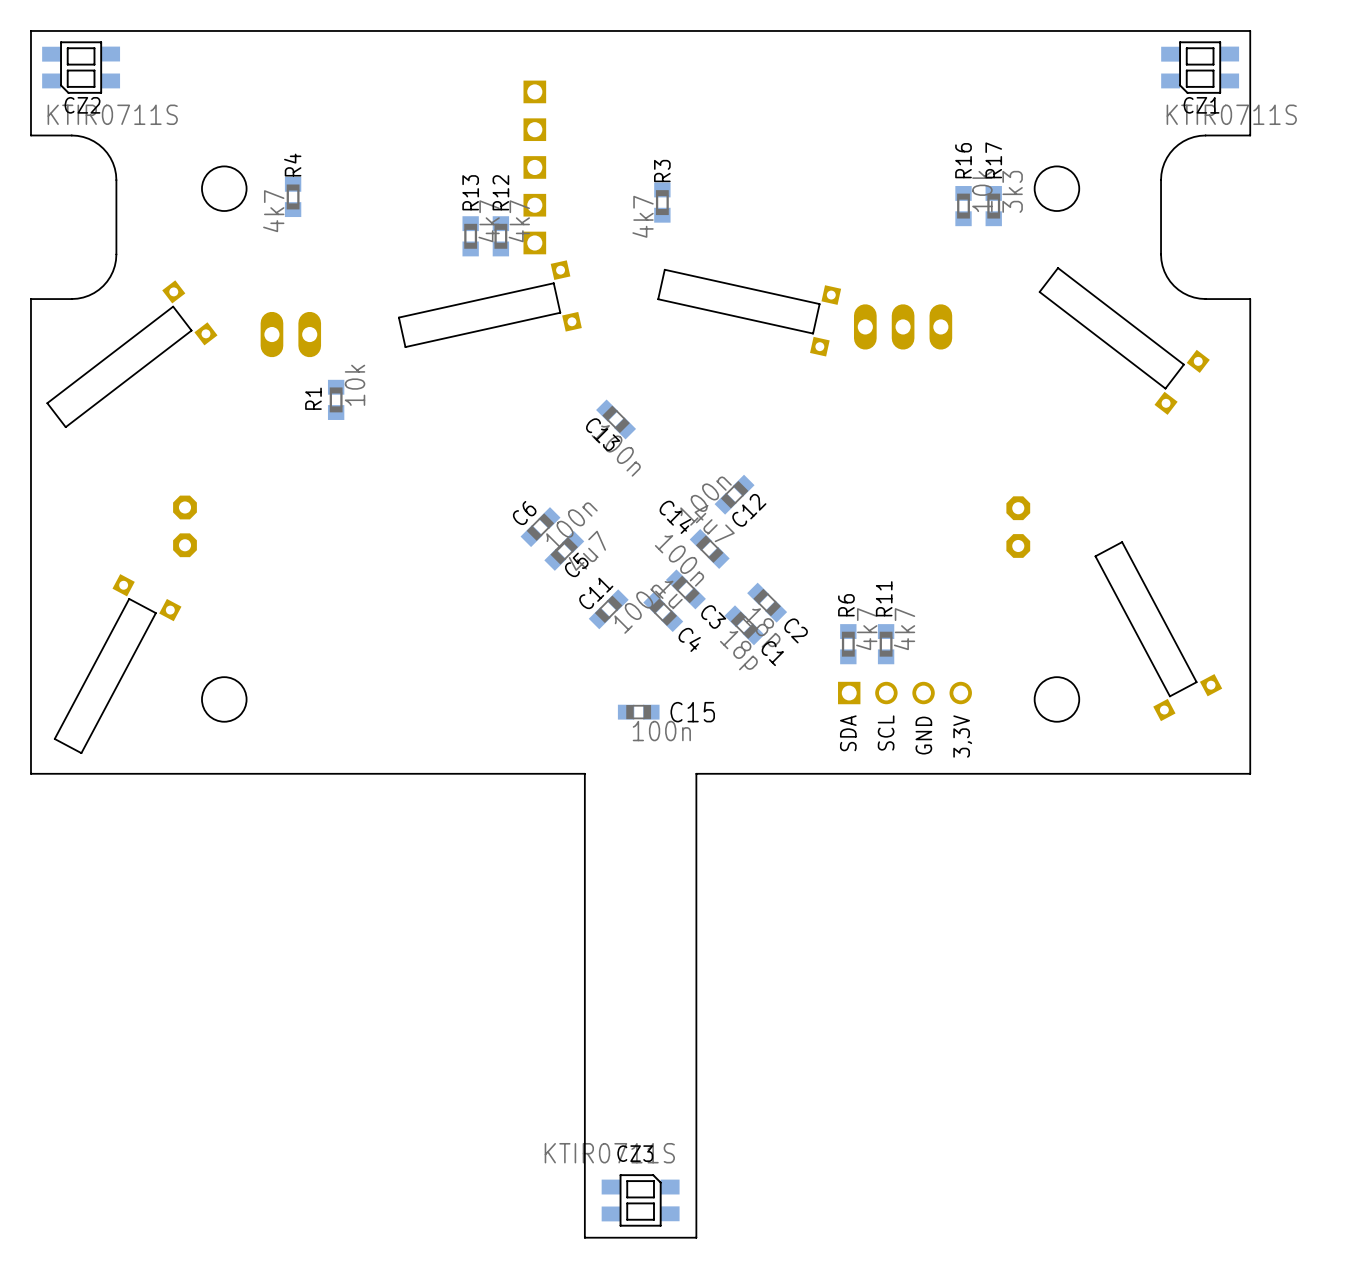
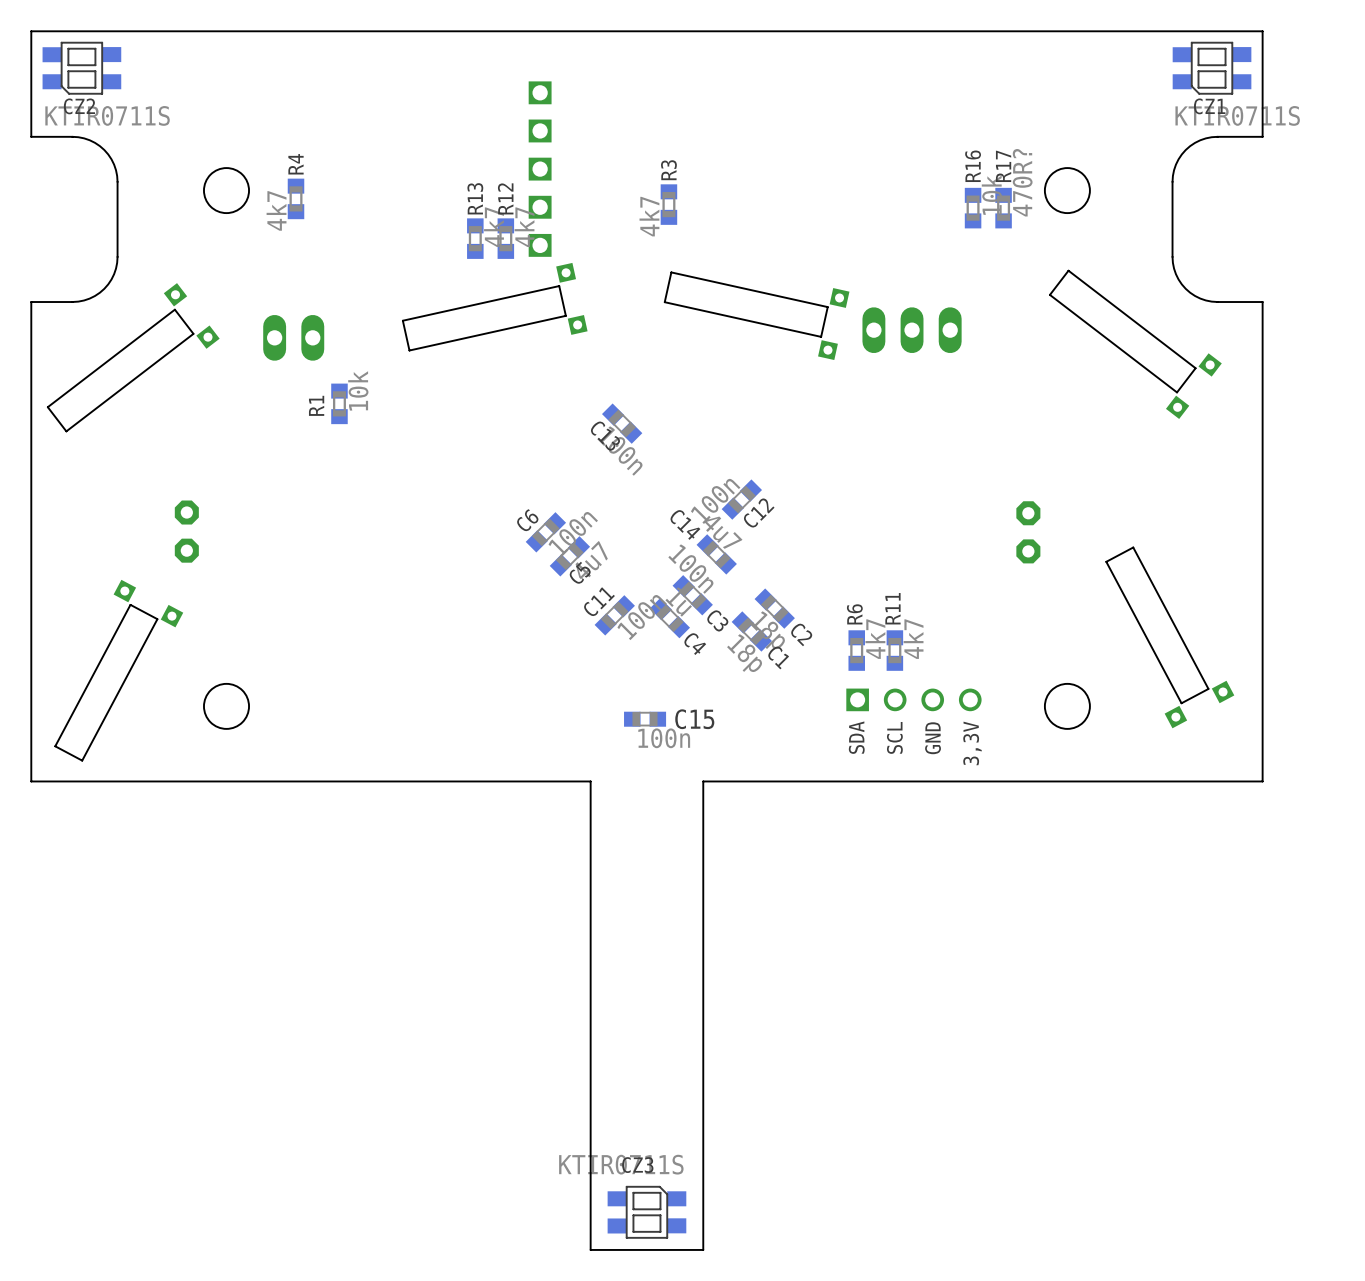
R17 value: 3k3 (1012, 191) -> 470R? (1022, 182)

